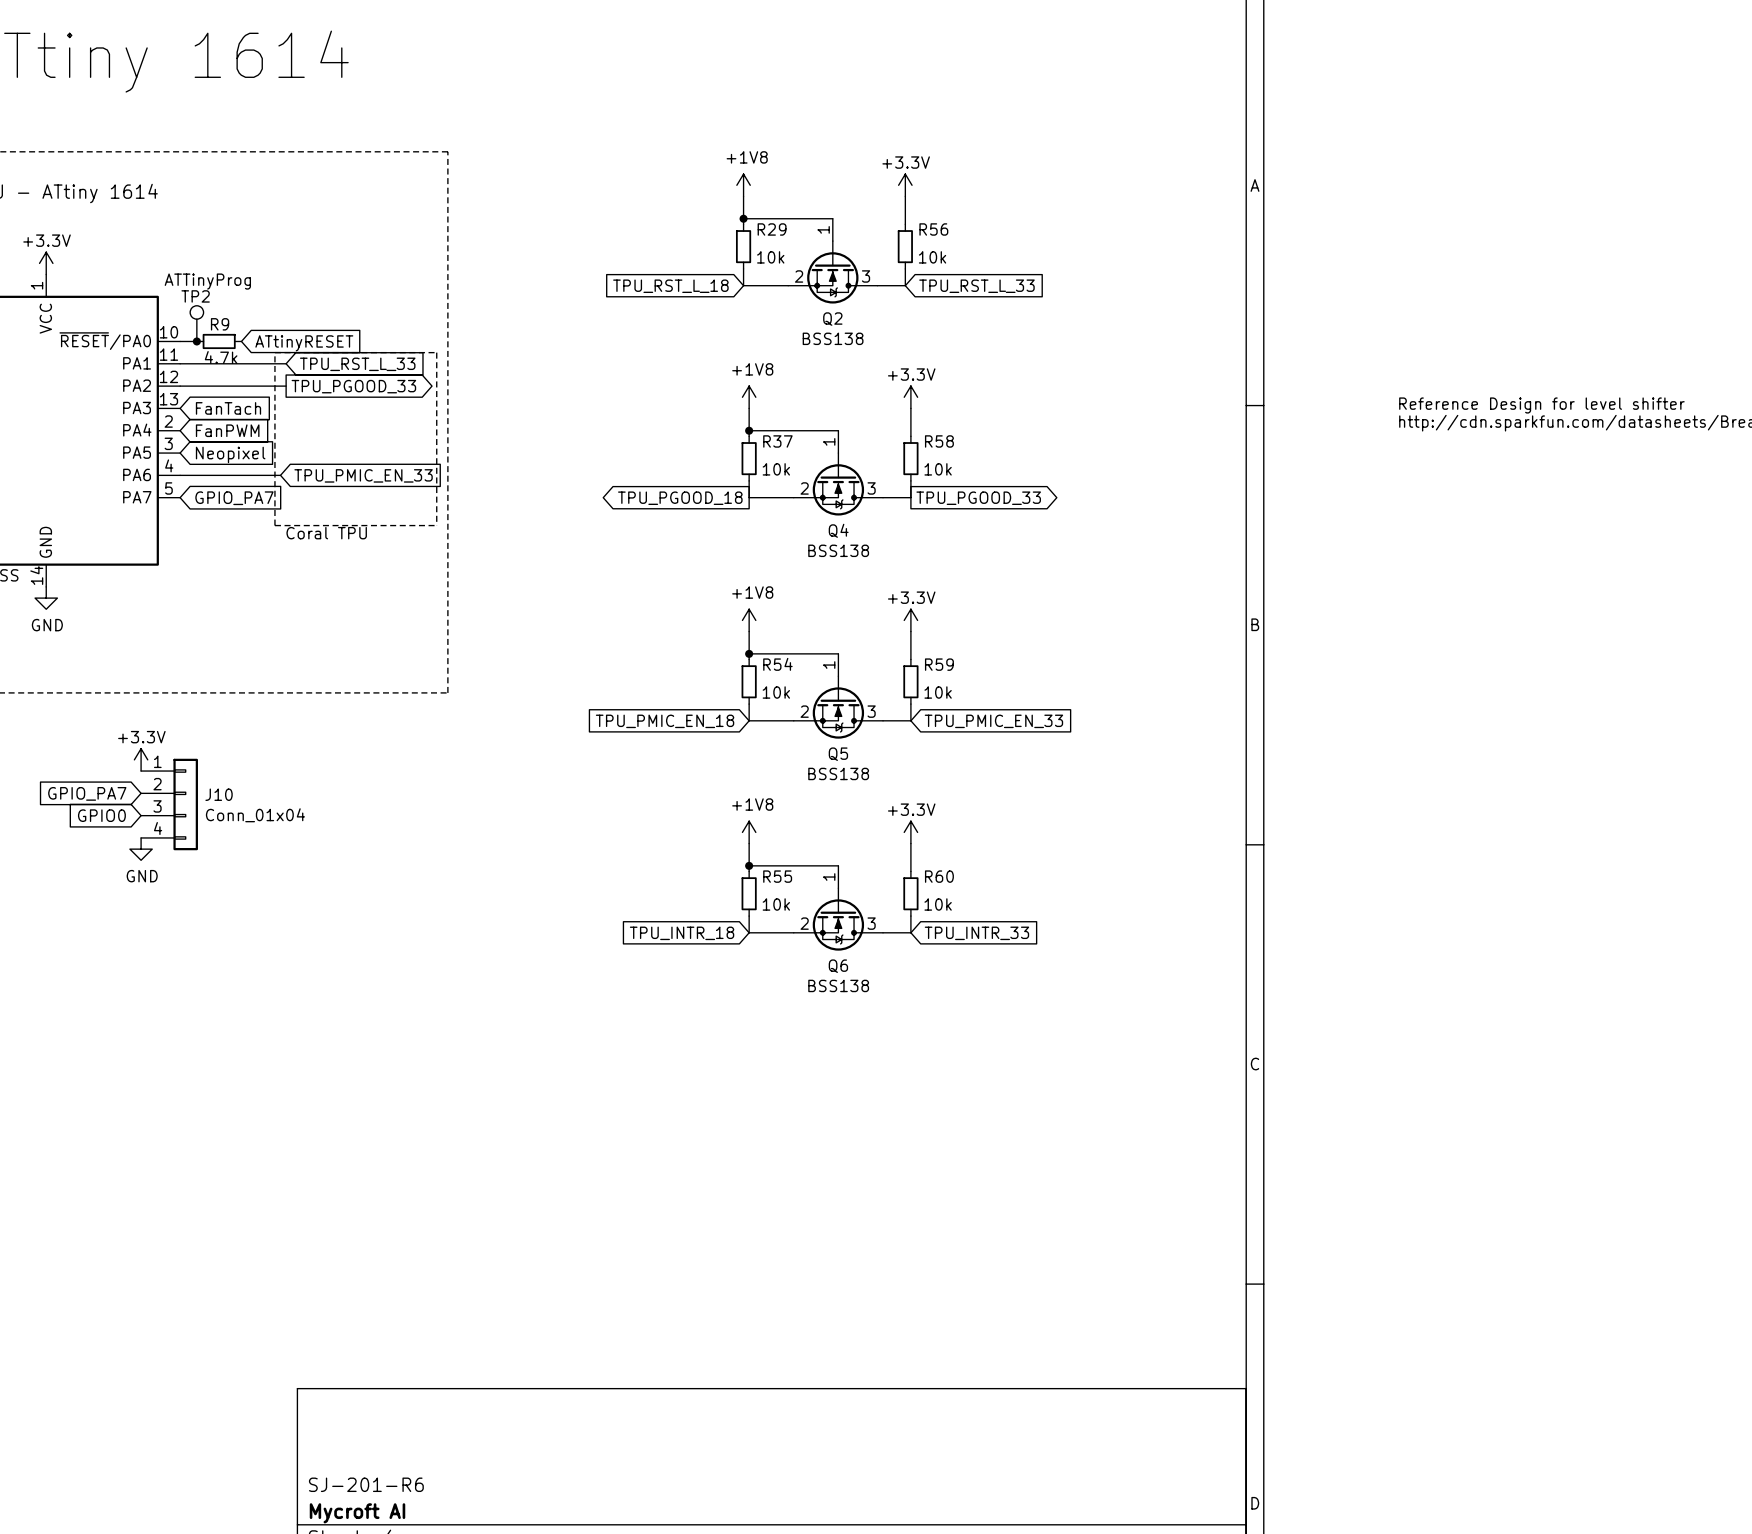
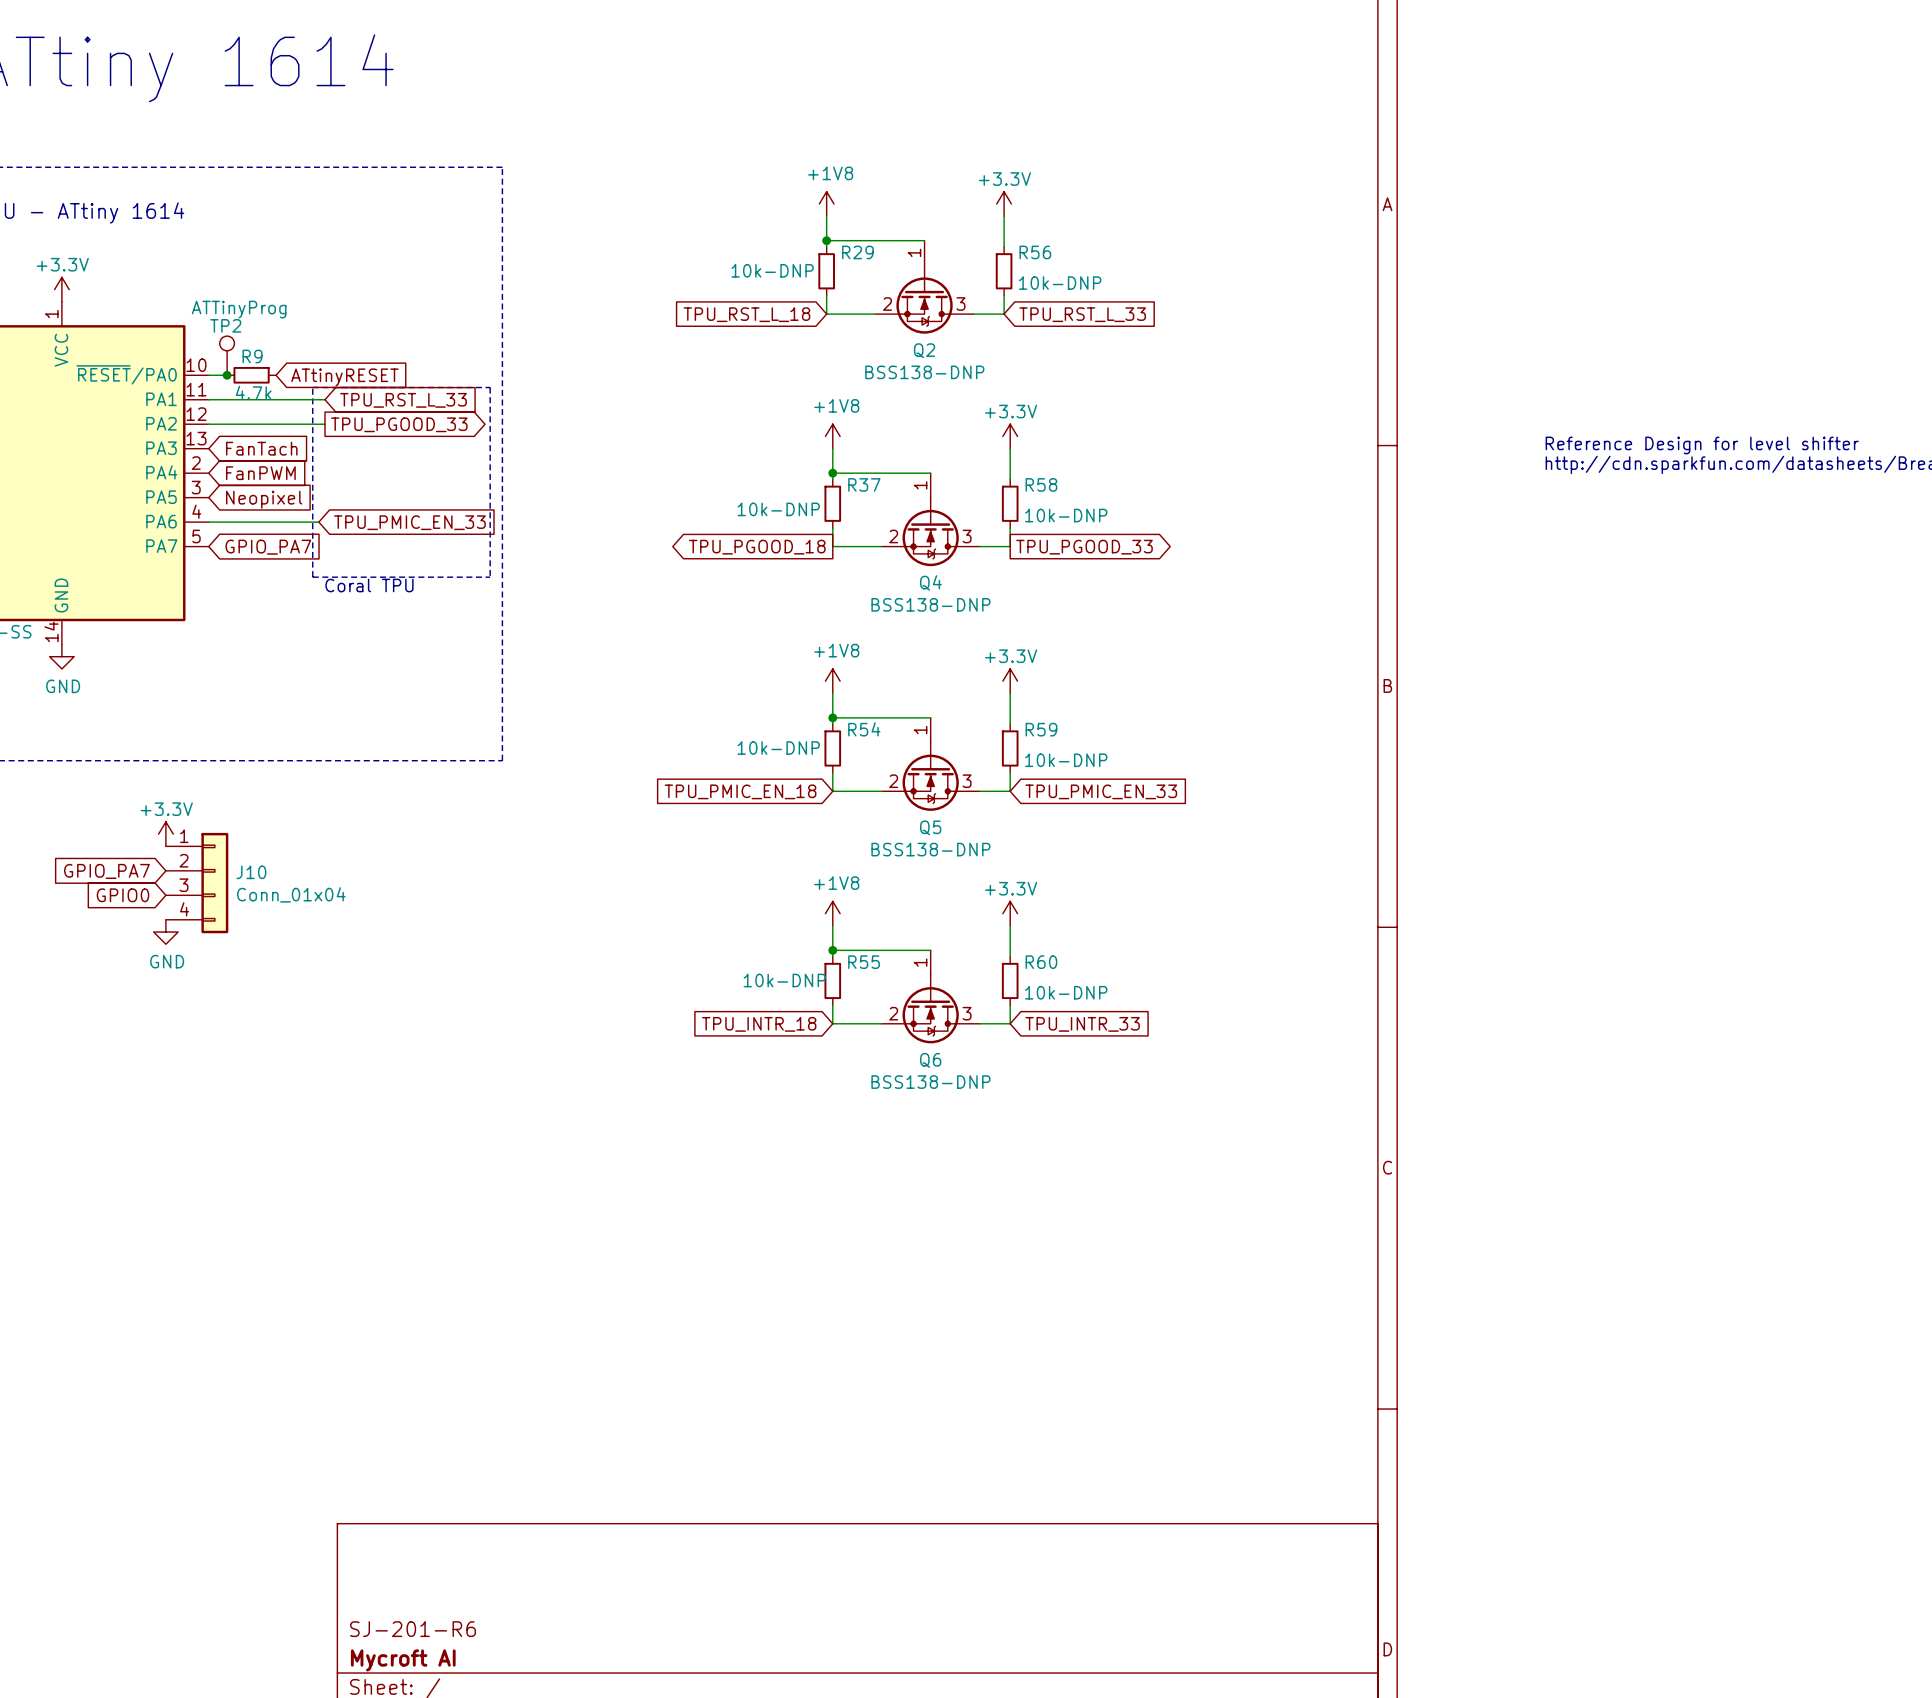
R29 value: 10k (770, 257) -> 10k-DNP (772, 270)
R56 value: 10k (932, 257) -> 10k-DNP (1060, 283)
Q2 value: BSS138 (833, 338) -> BSS138-DNP (924, 372)
R37 value: 10k (776, 469) -> 10k-DNP (778, 509)
R58 value: 10k (938, 469) -> 10k-DNP (1066, 515)
Q4 value: BSS138 (838, 550) -> BSS138-DNP (930, 604)
R54 value: 10k (776, 692) -> 10k-DNP (778, 748)
R59 value: 10k (938, 692) -> 10k-DNP (1066, 760)
Q5 value: BSS138 (838, 773) -> BSS138-DNP (930, 849)
R55 value: 10k (776, 904) -> 10k-DNP (784, 980)
R60 value: 10k (938, 904) -> 10k-DNP (1066, 992)
Q6 value: BSS138 (838, 985) -> BSS138-DNP (930, 1082)

